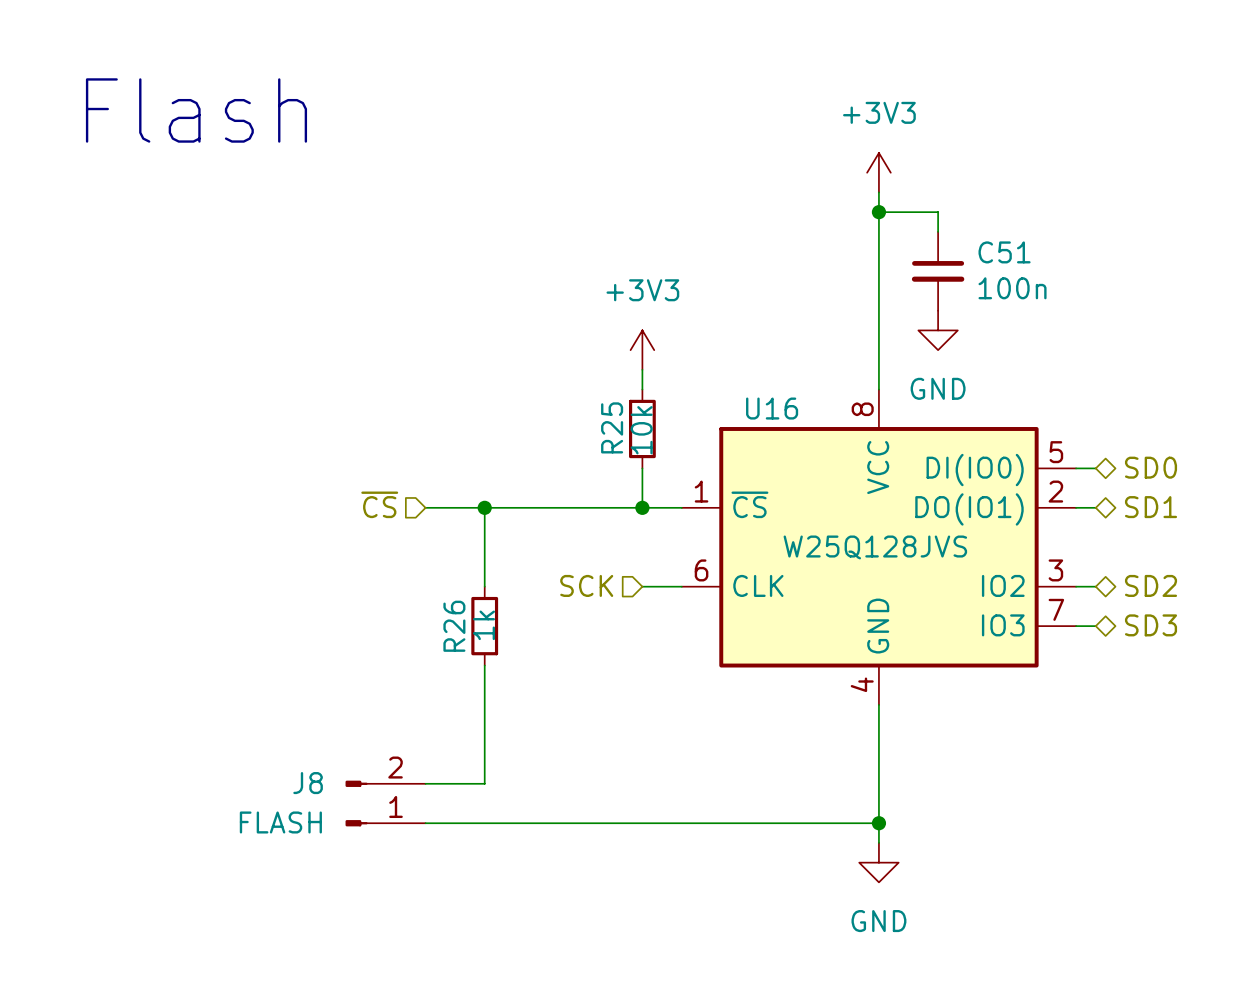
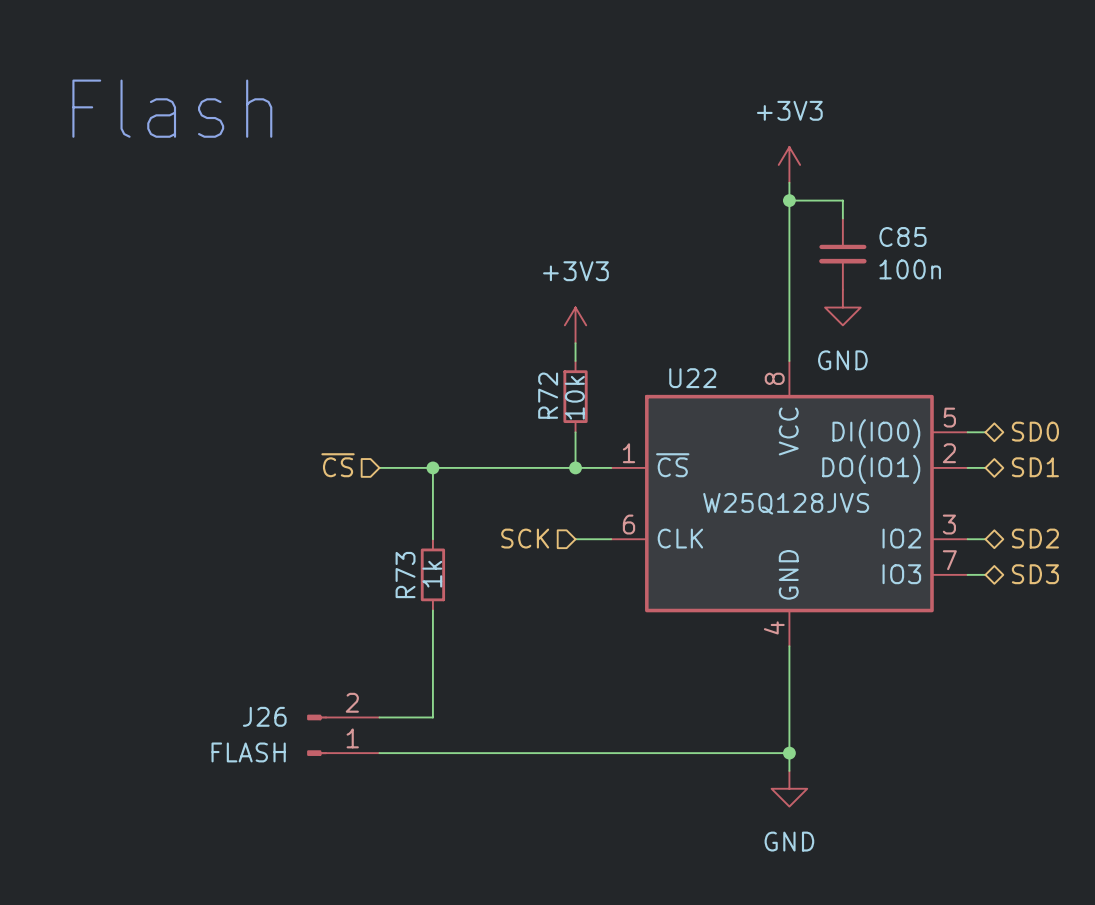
C51 name: C51 (1004, 252) -> C85 (902, 236)
U16 name: U16 (772, 408) -> U22 (692, 378)
R25 name: R25 (612, 427) -> R72 (548, 395)
R26 name: R26 (454, 626) -> R73 (405, 575)
J8 name: J8 (308, 783) -> J26 (264, 716)

